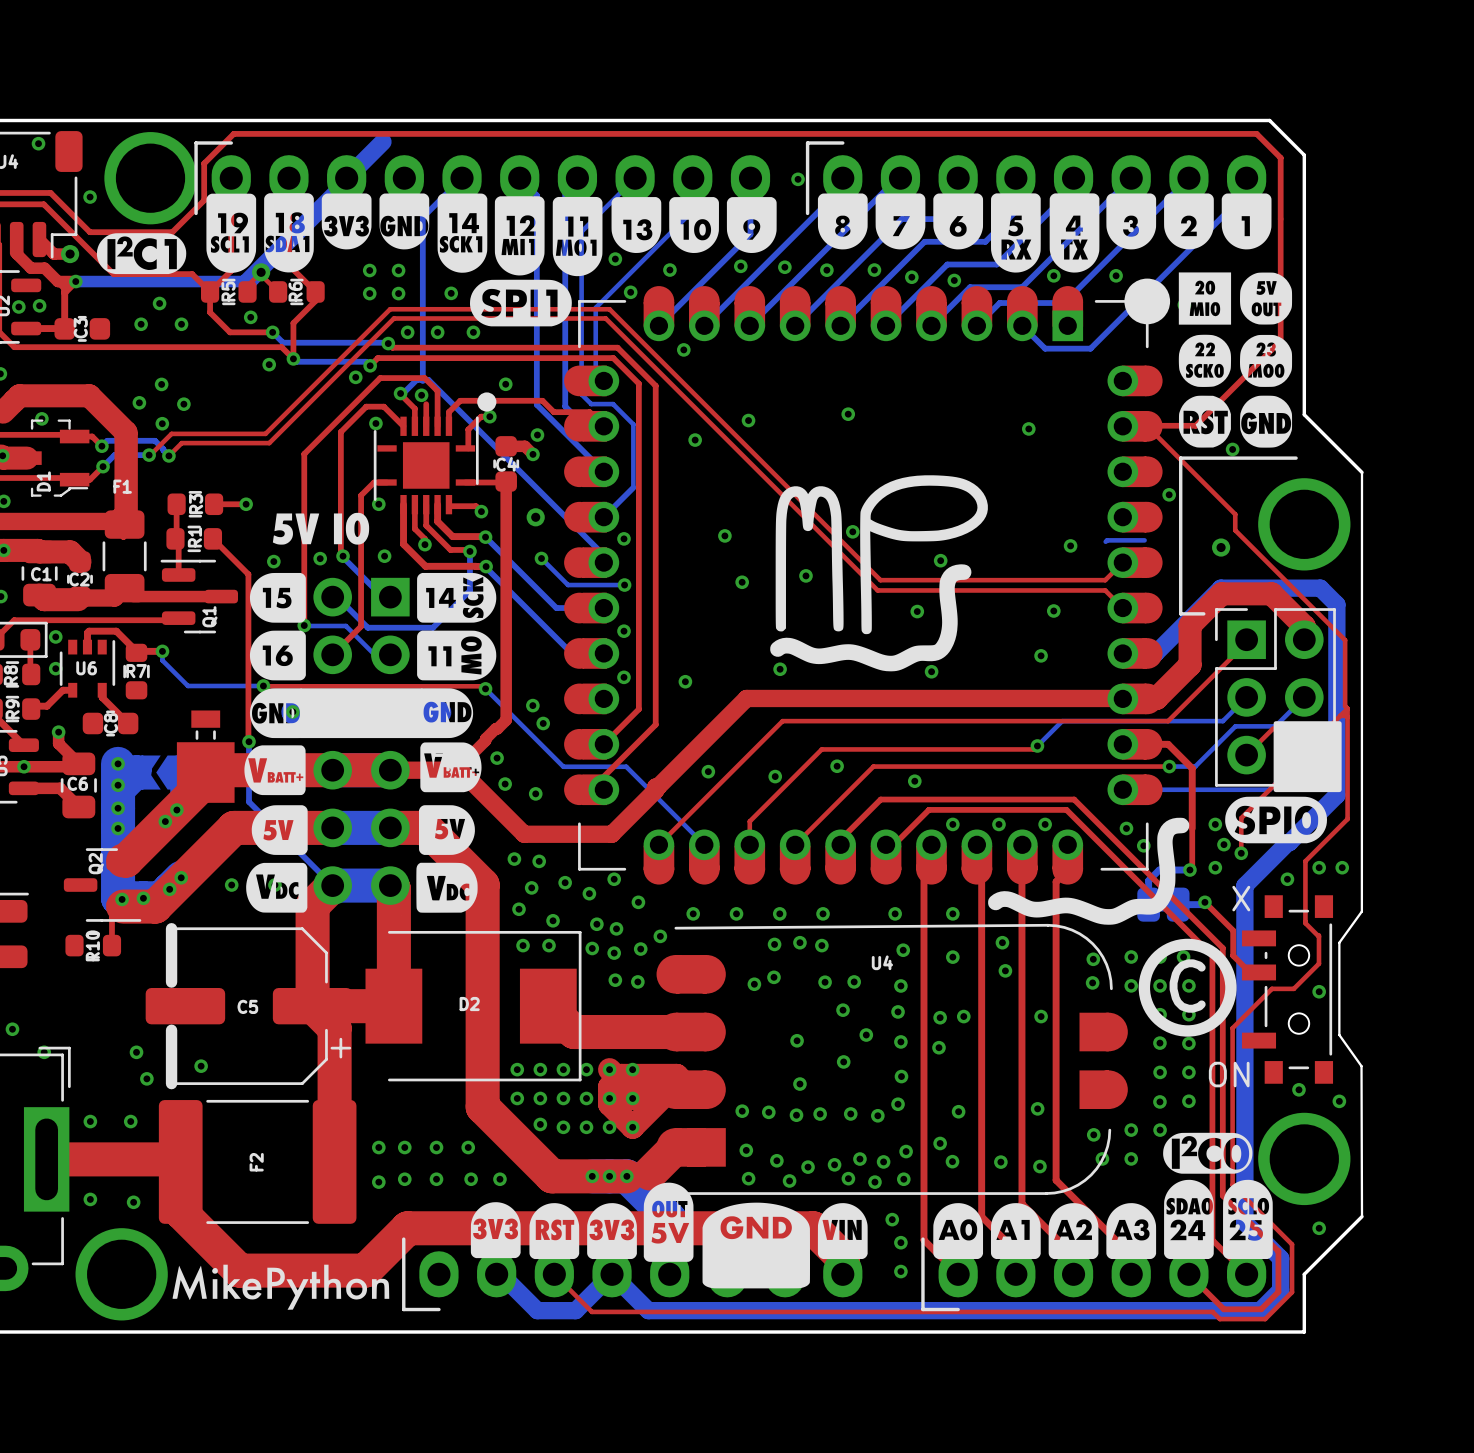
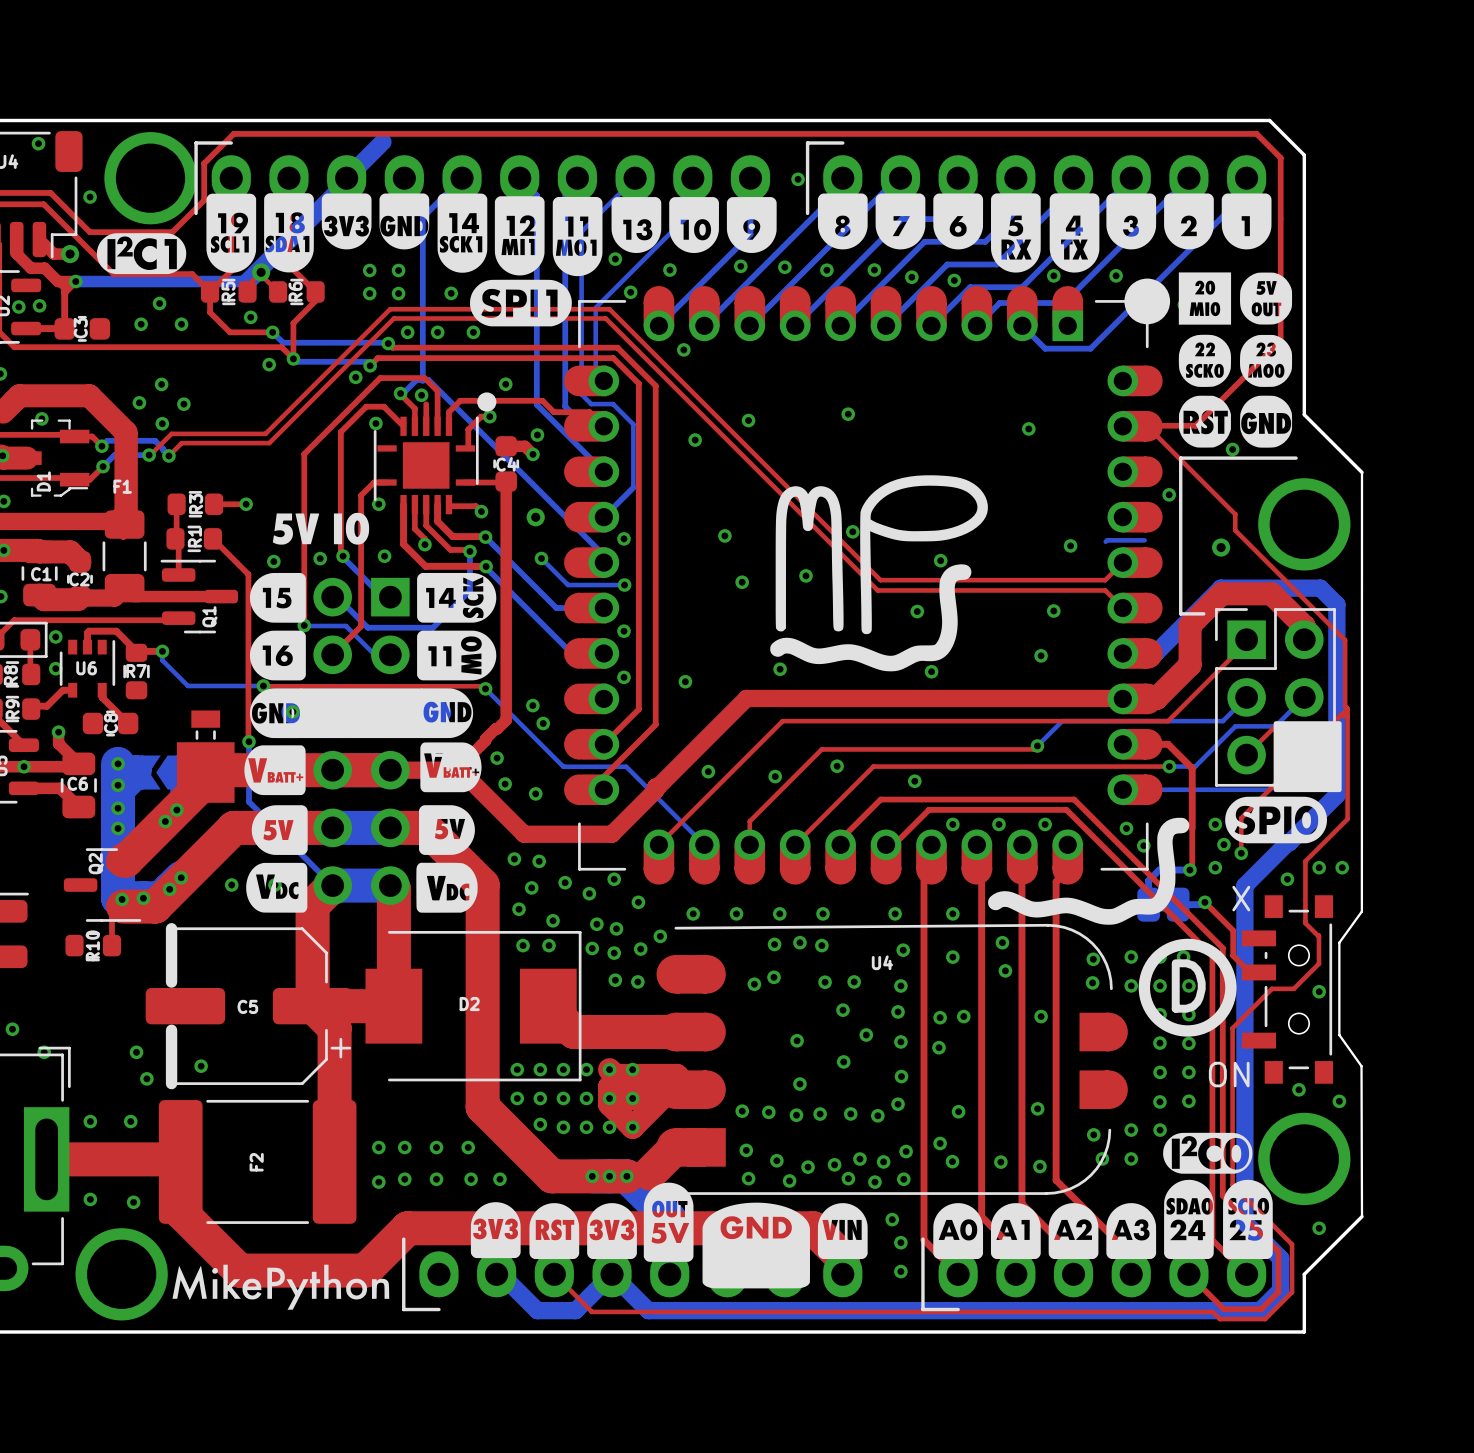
drawing shape: [1138, 938, 1237, 1037] -> [1138, 938, 1237, 1037]

